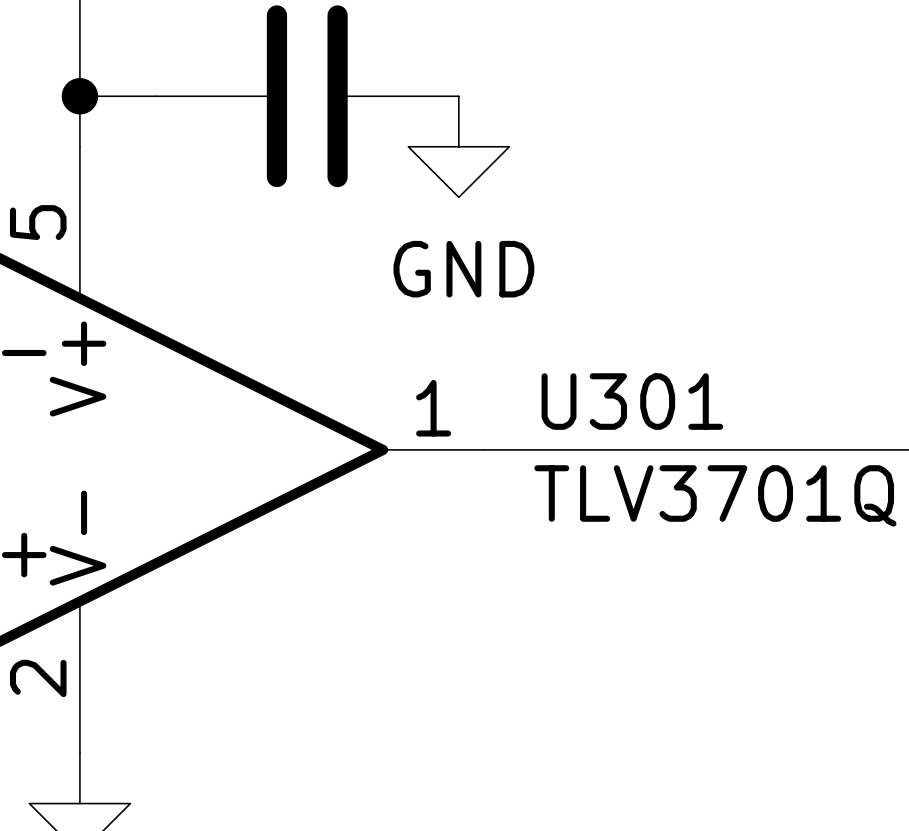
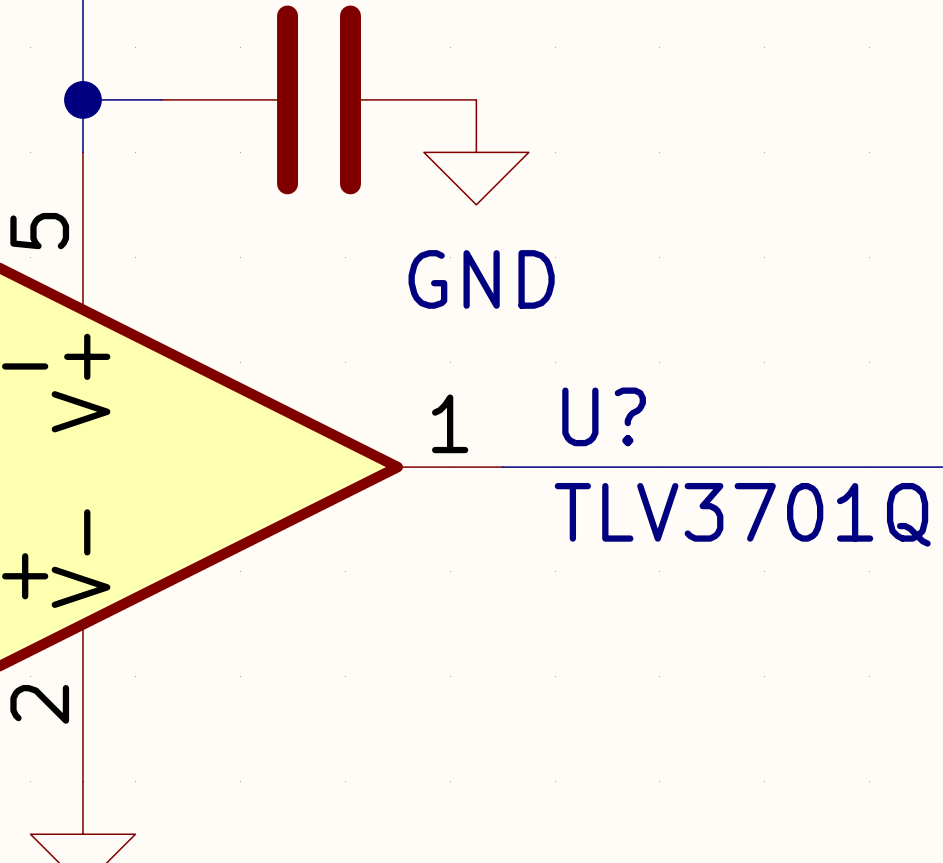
U301 name: U301 (632, 401) -> U? (604, 416)

